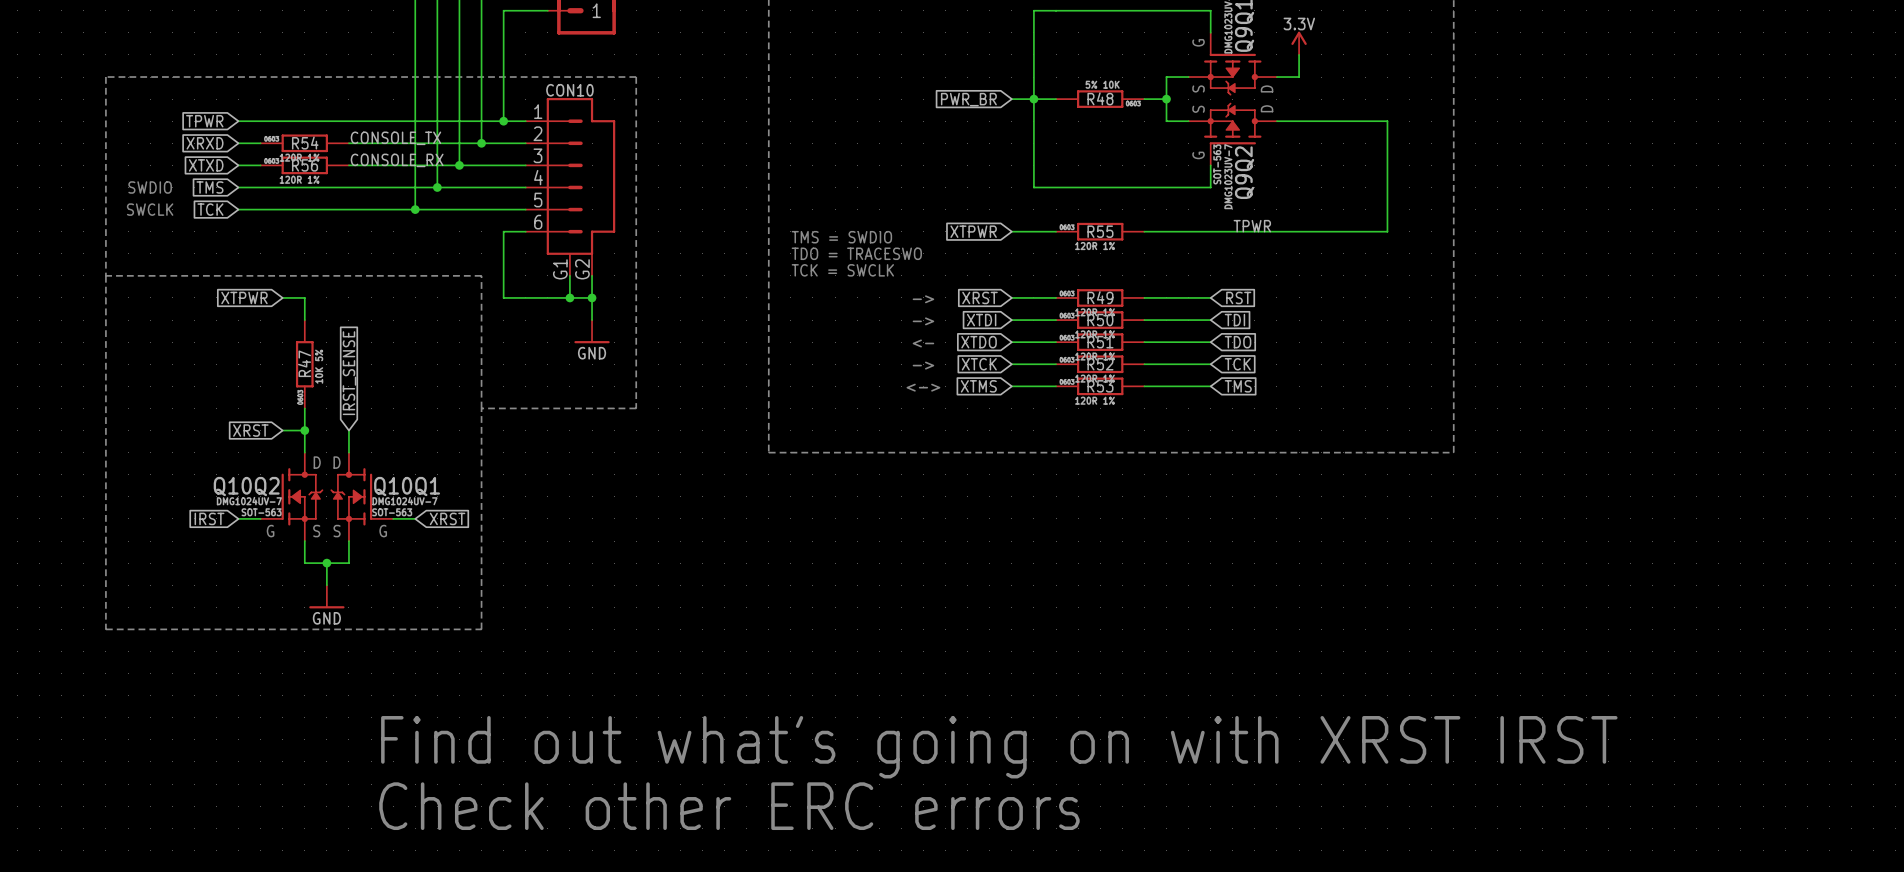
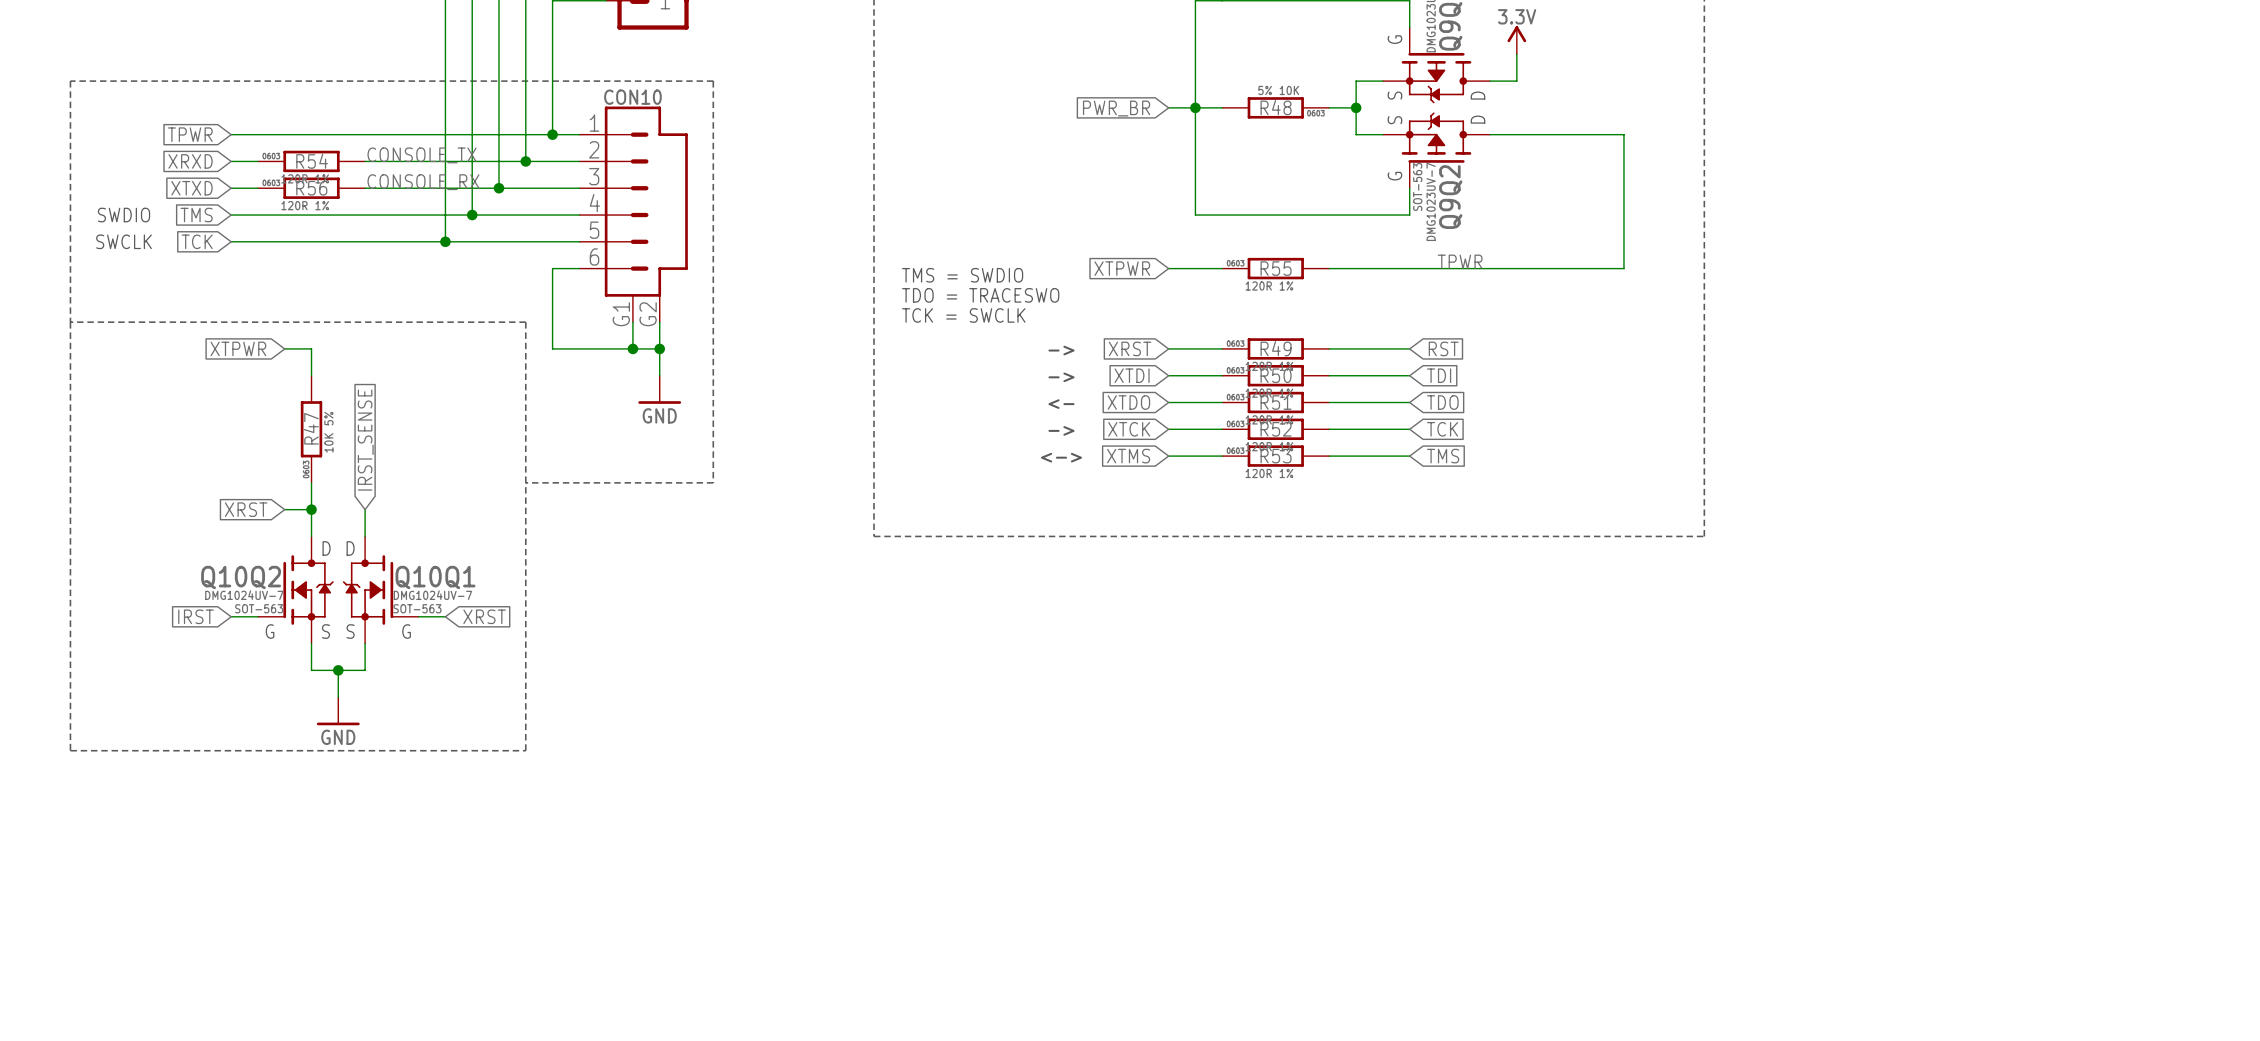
text: Find out what's going on with XRST IRST (999, 747) -> none
text: Check other ERC errors (729, 806) -> none

